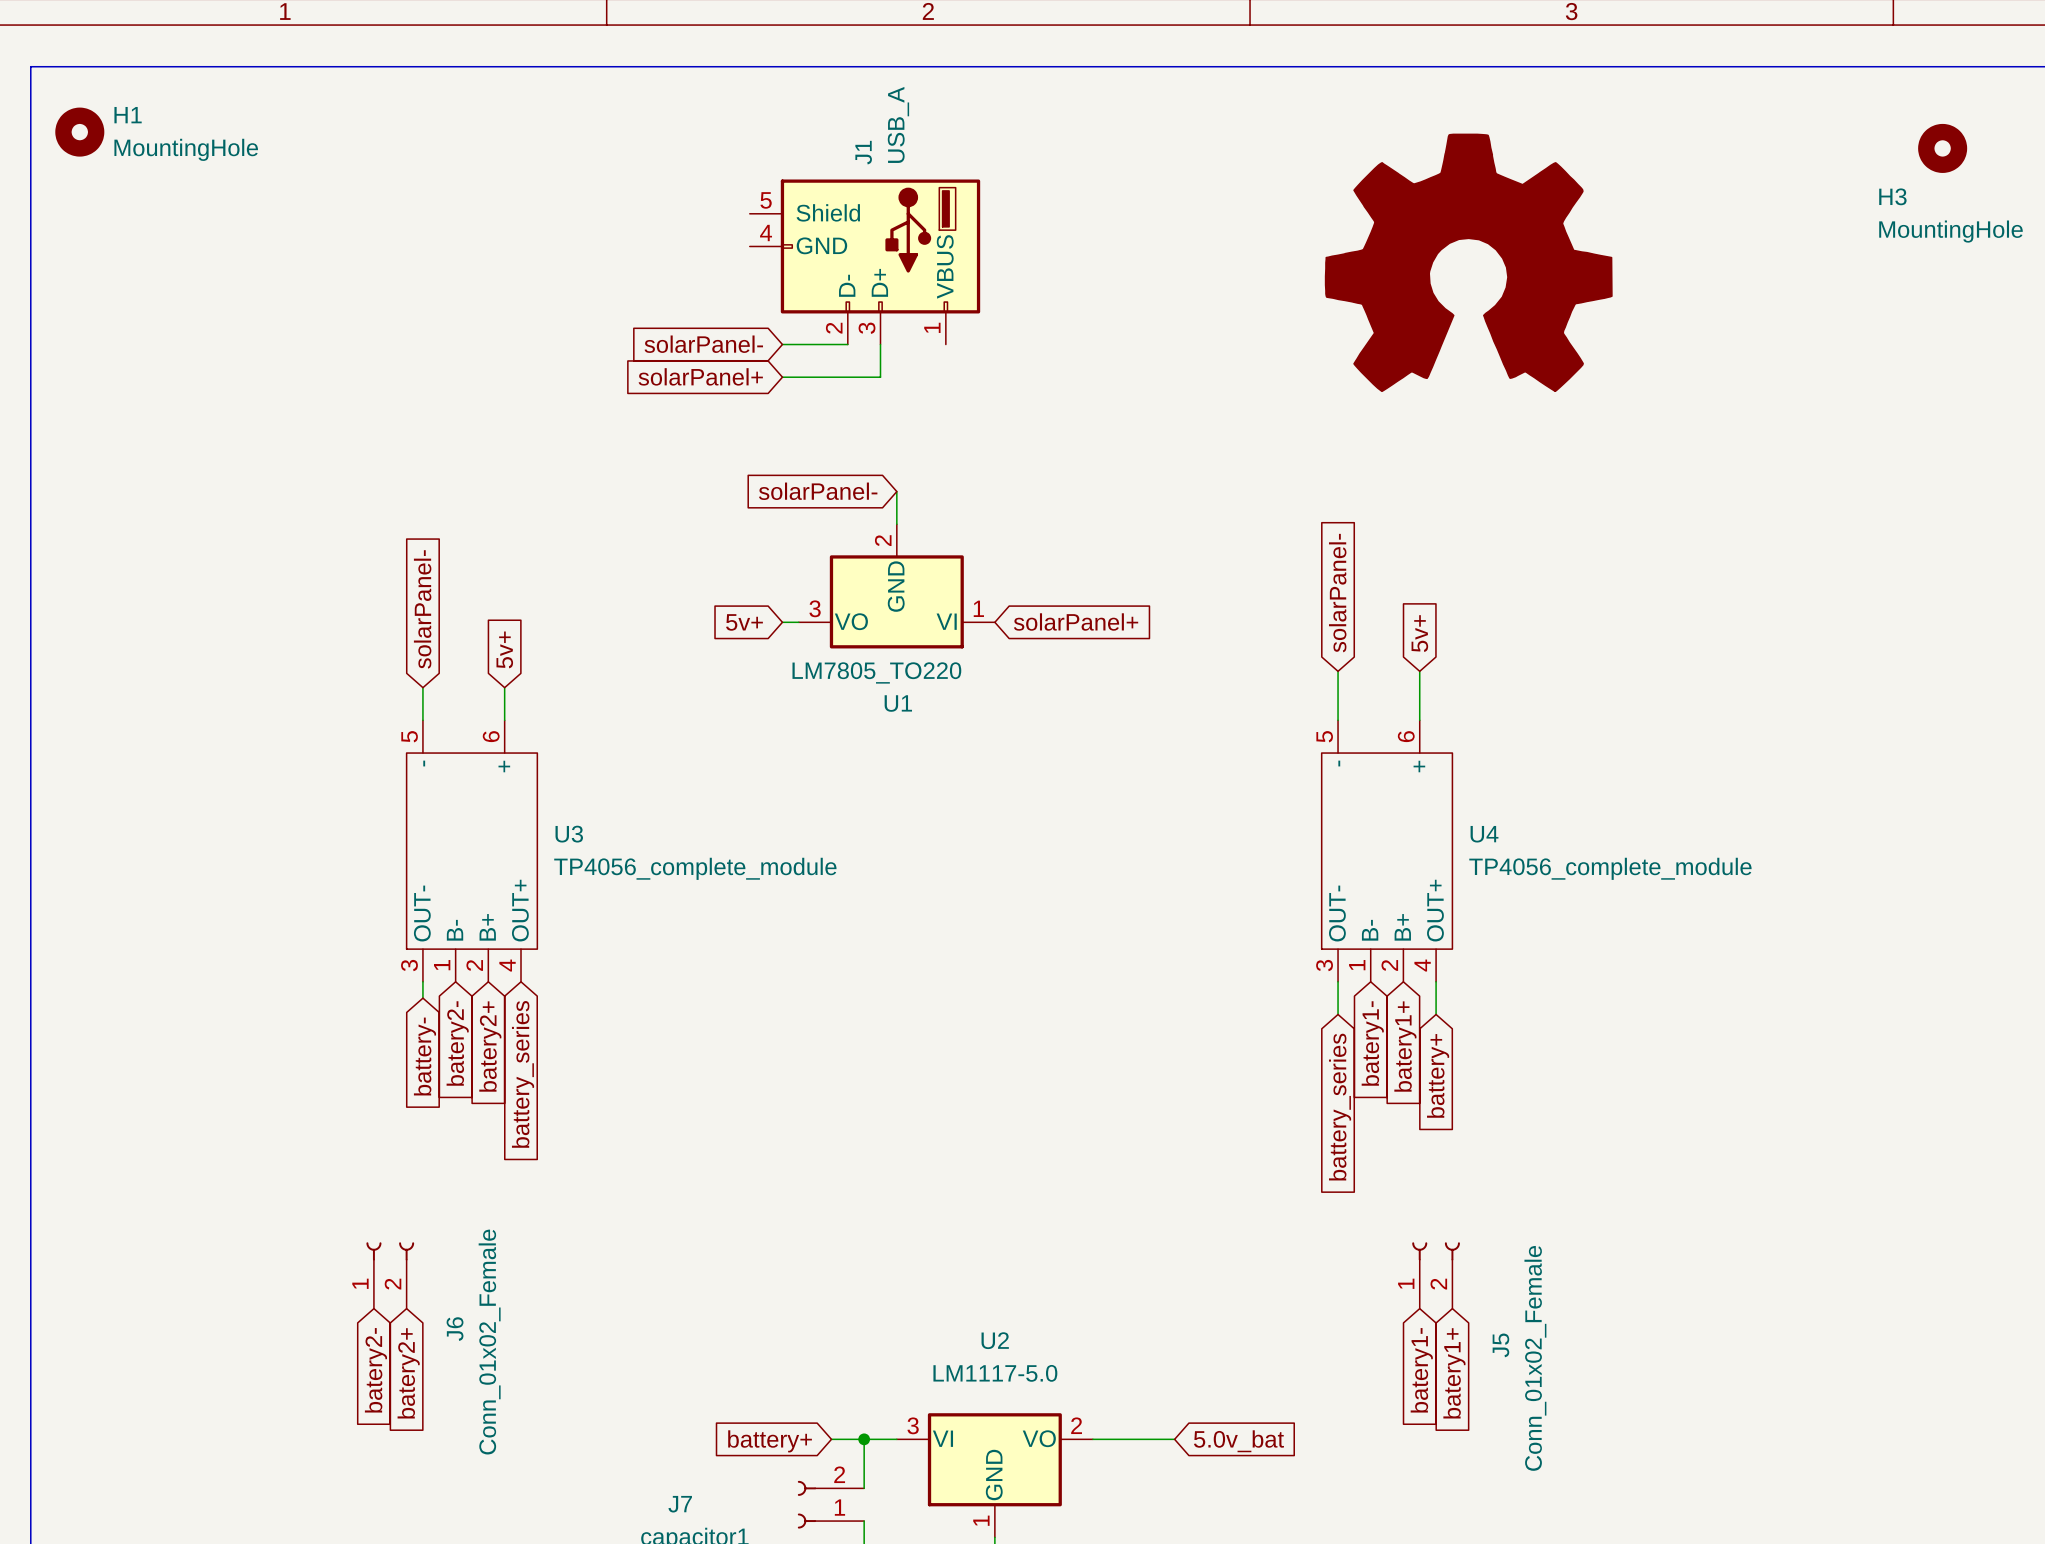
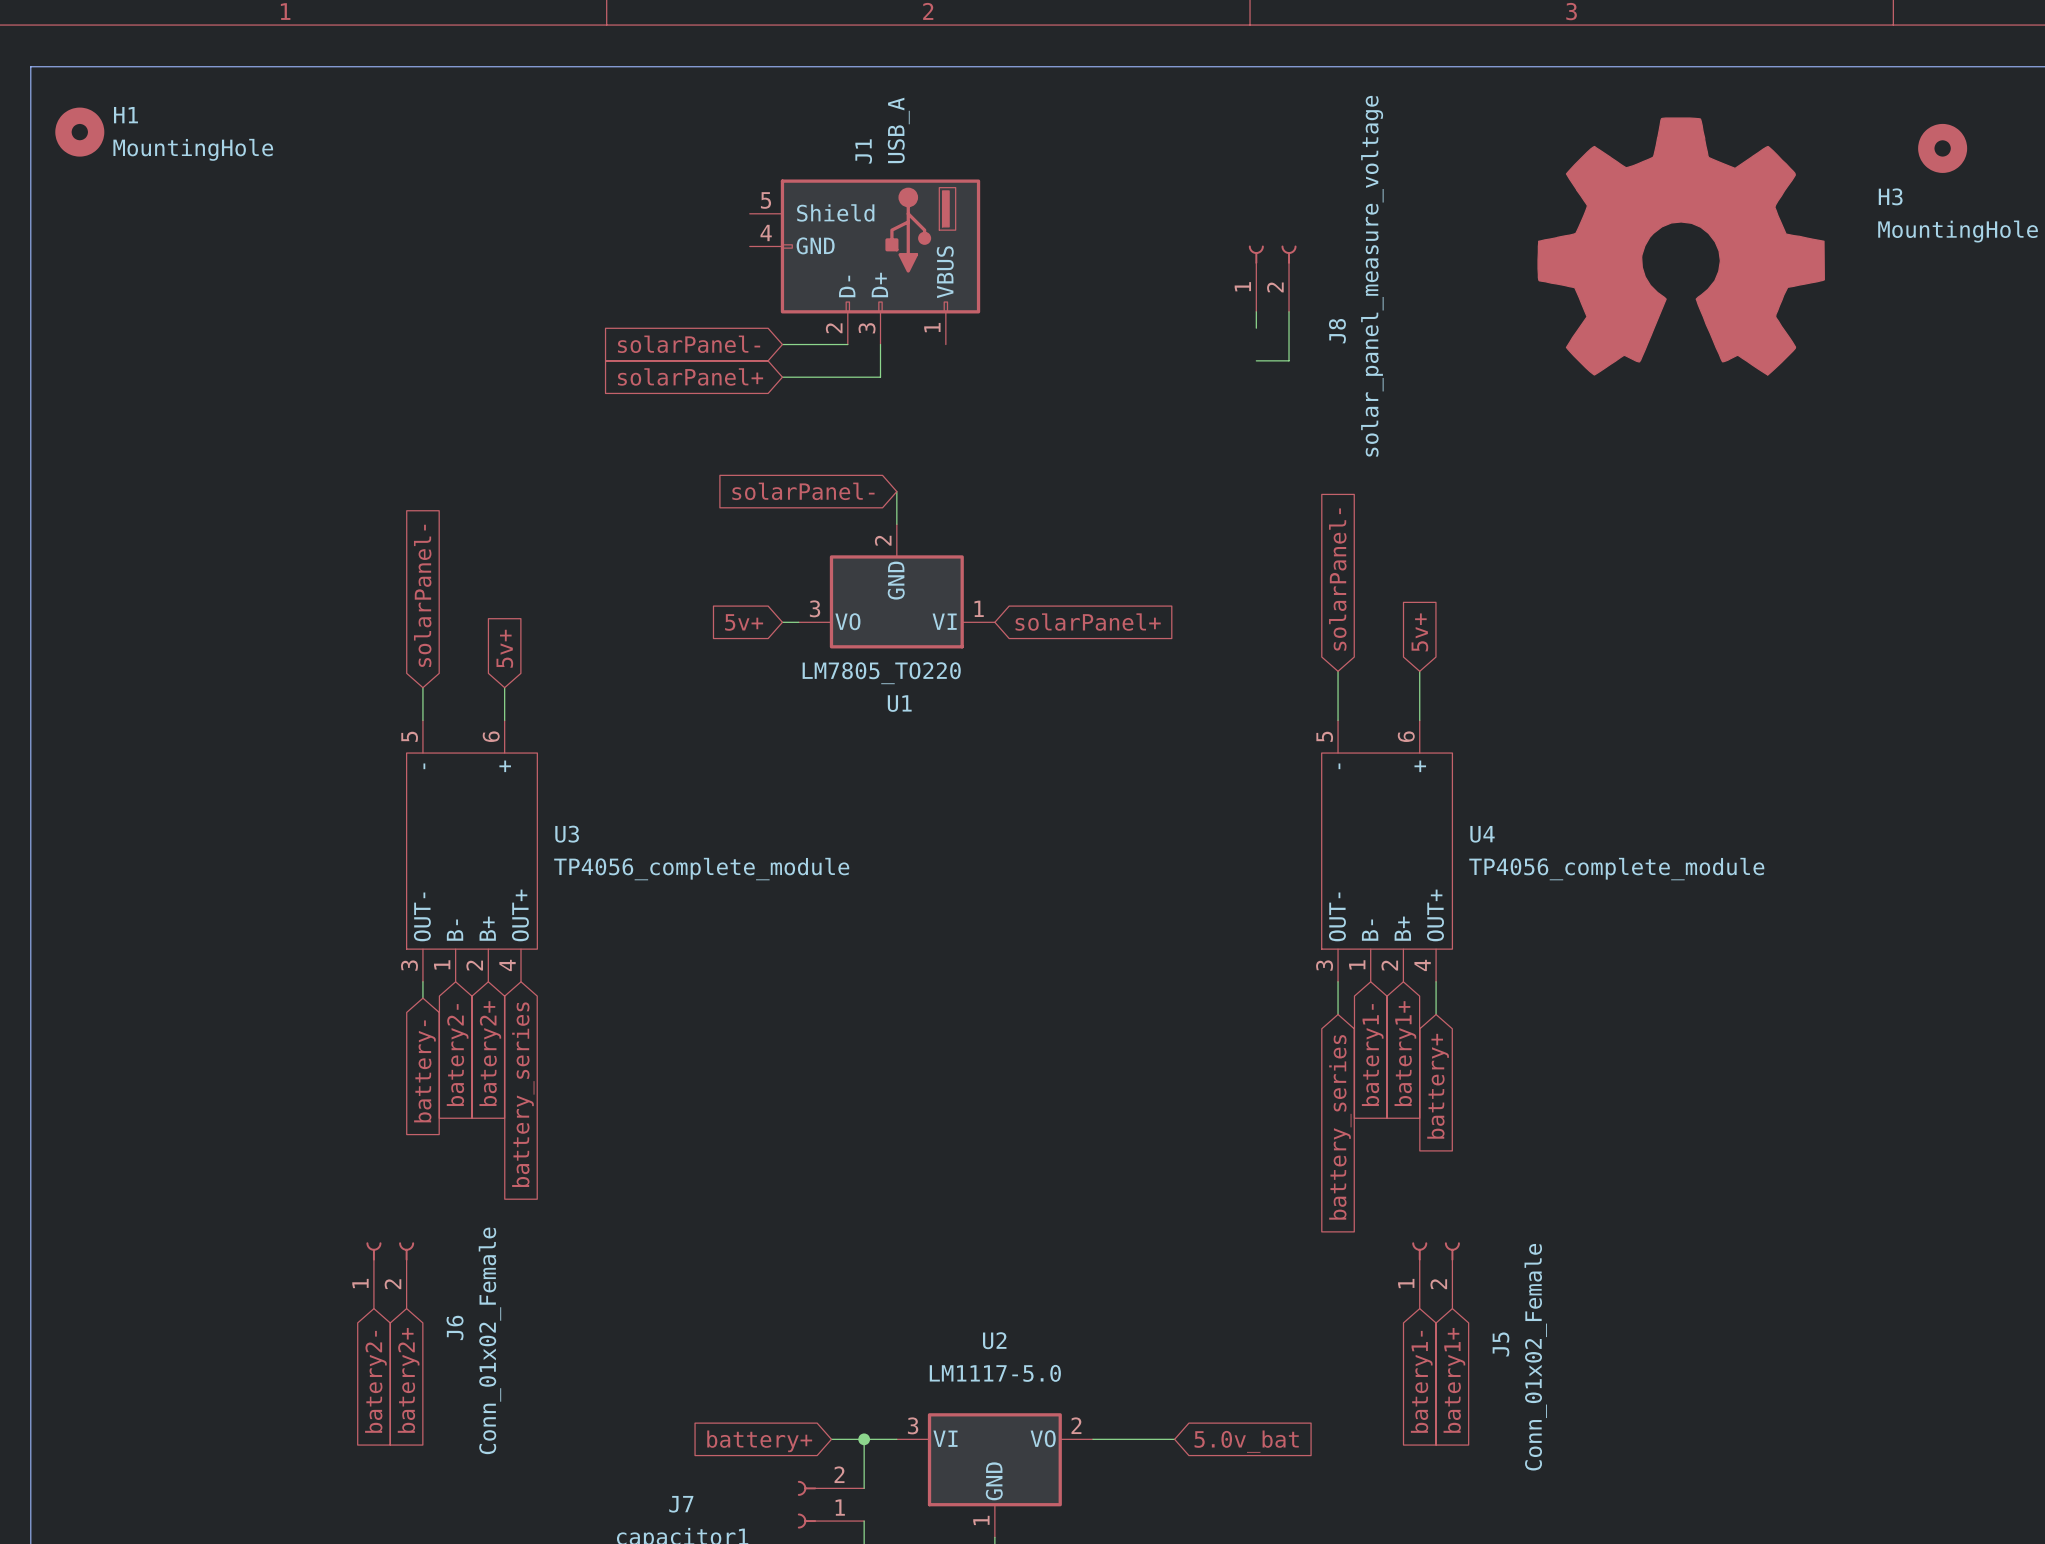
power symbol position: (1468, 262) -> (1681, 246)
J8: none -> solar_panel_measure_voltage (1272, 278)
wire: none -> (1256, 311) (1256, 328)
wire: none -> (1289, 311) (1289, 360) (1256, 360)

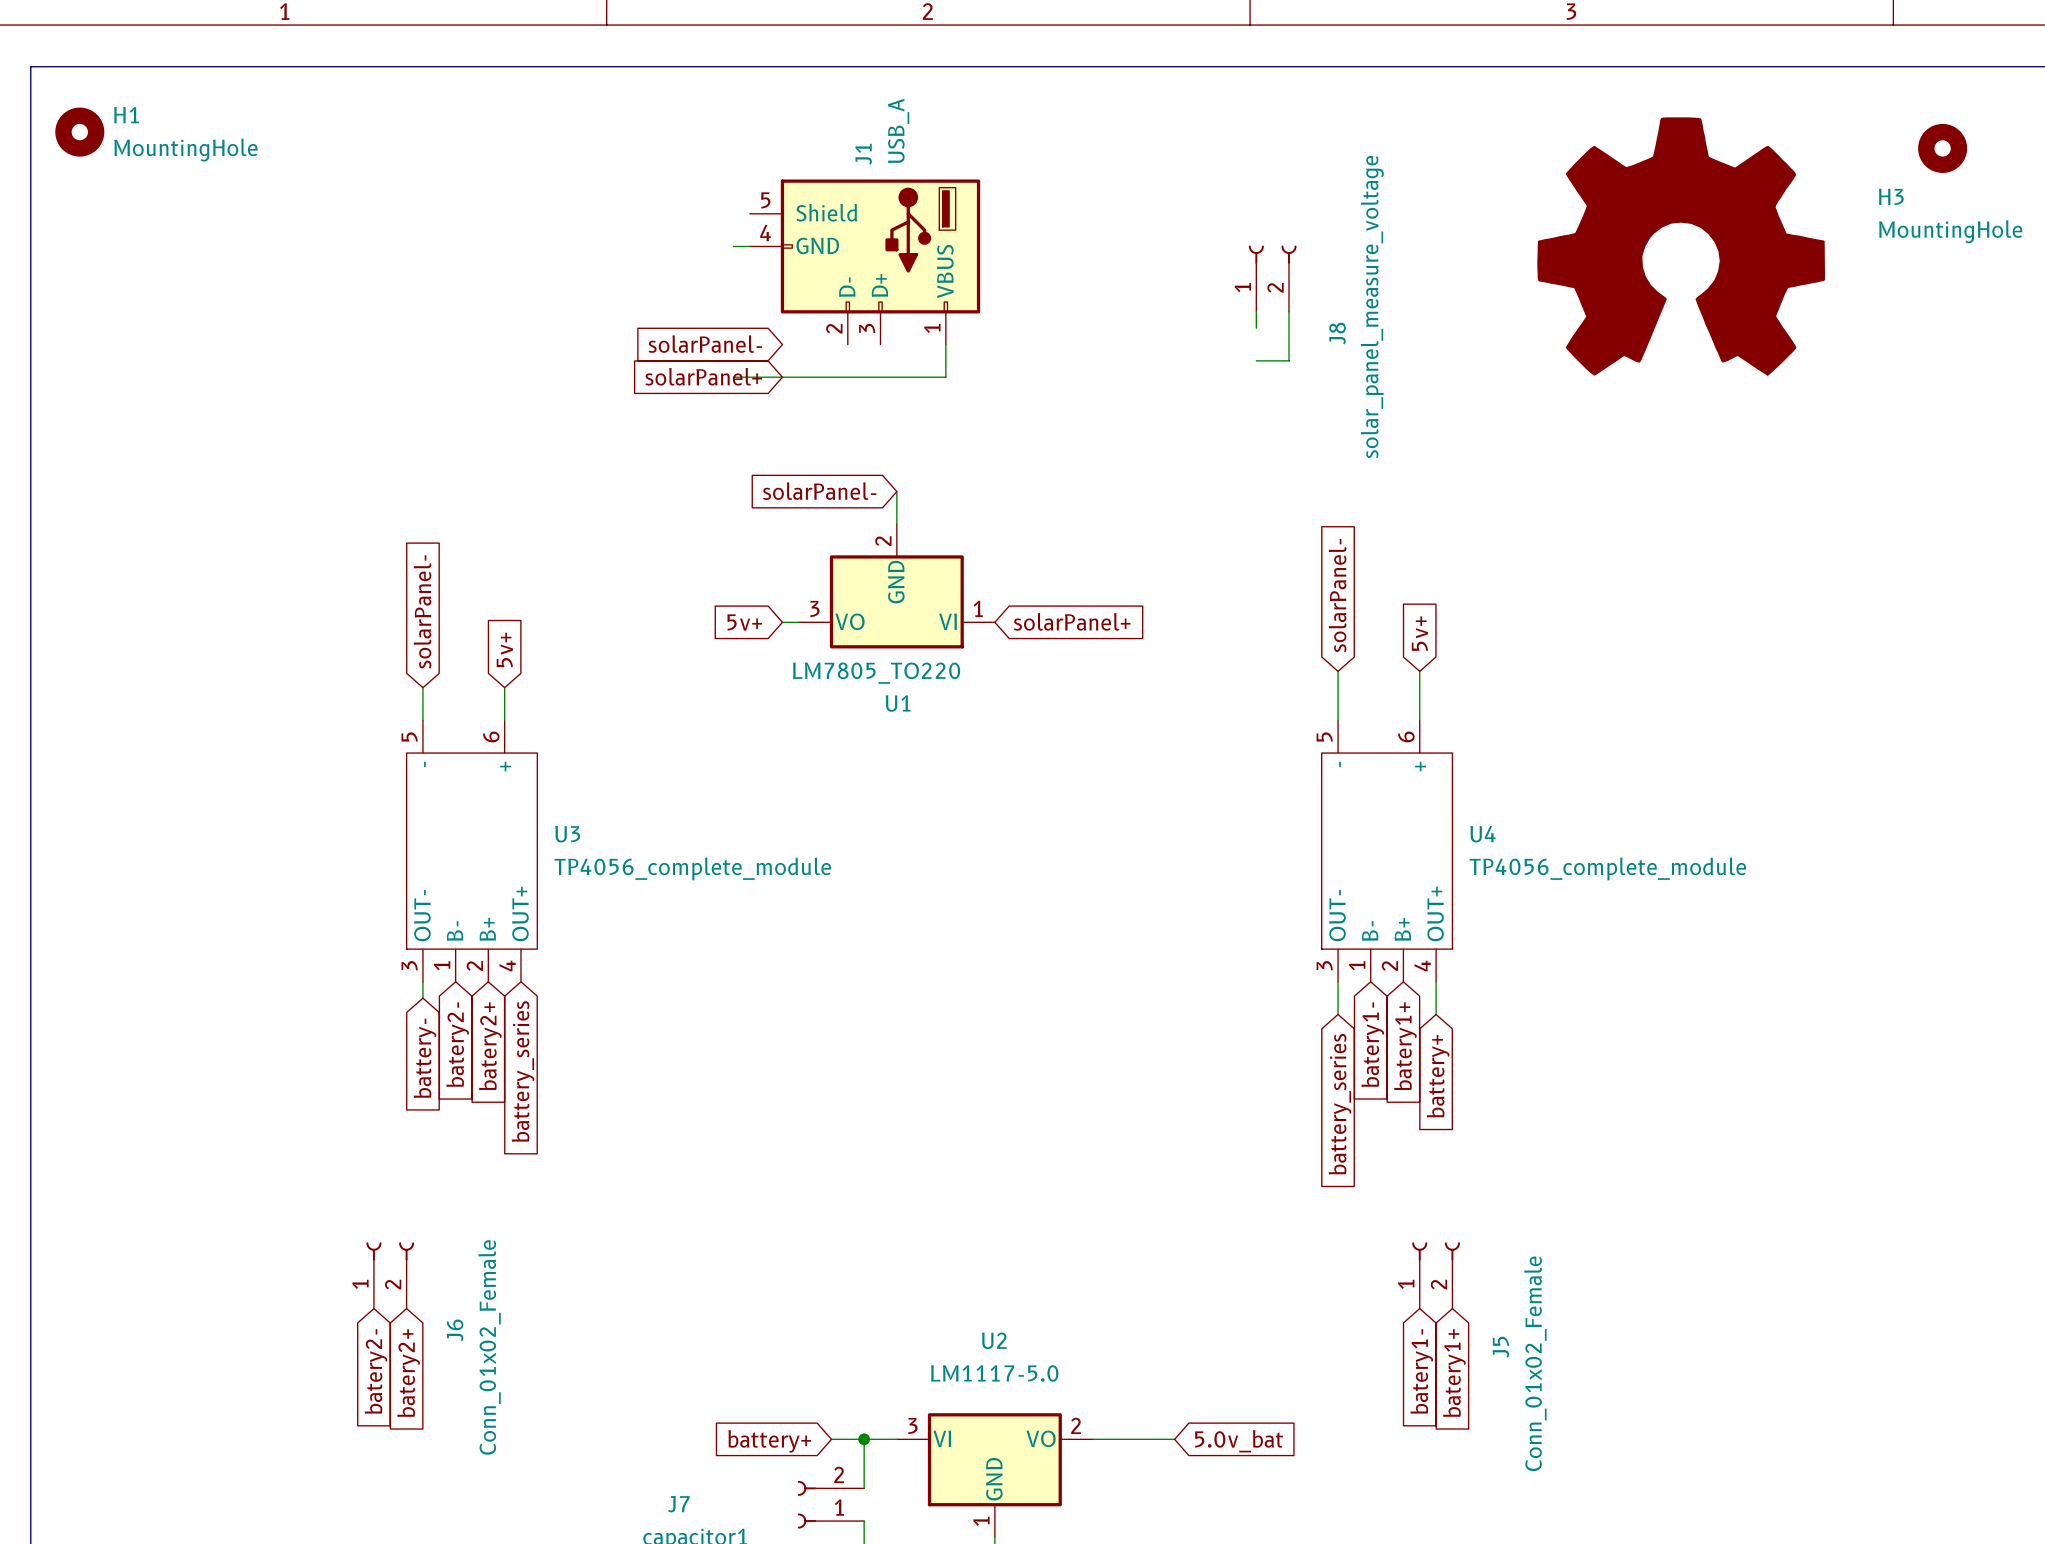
wire: none -> (733, 246) (749, 246)
wire: (782, 344) (847, 344) -> none
wire: (880, 344) (880, 377) -> (945, 344) (945, 377) (880, 377)
wire: none -> (733, 377) (782, 377)

